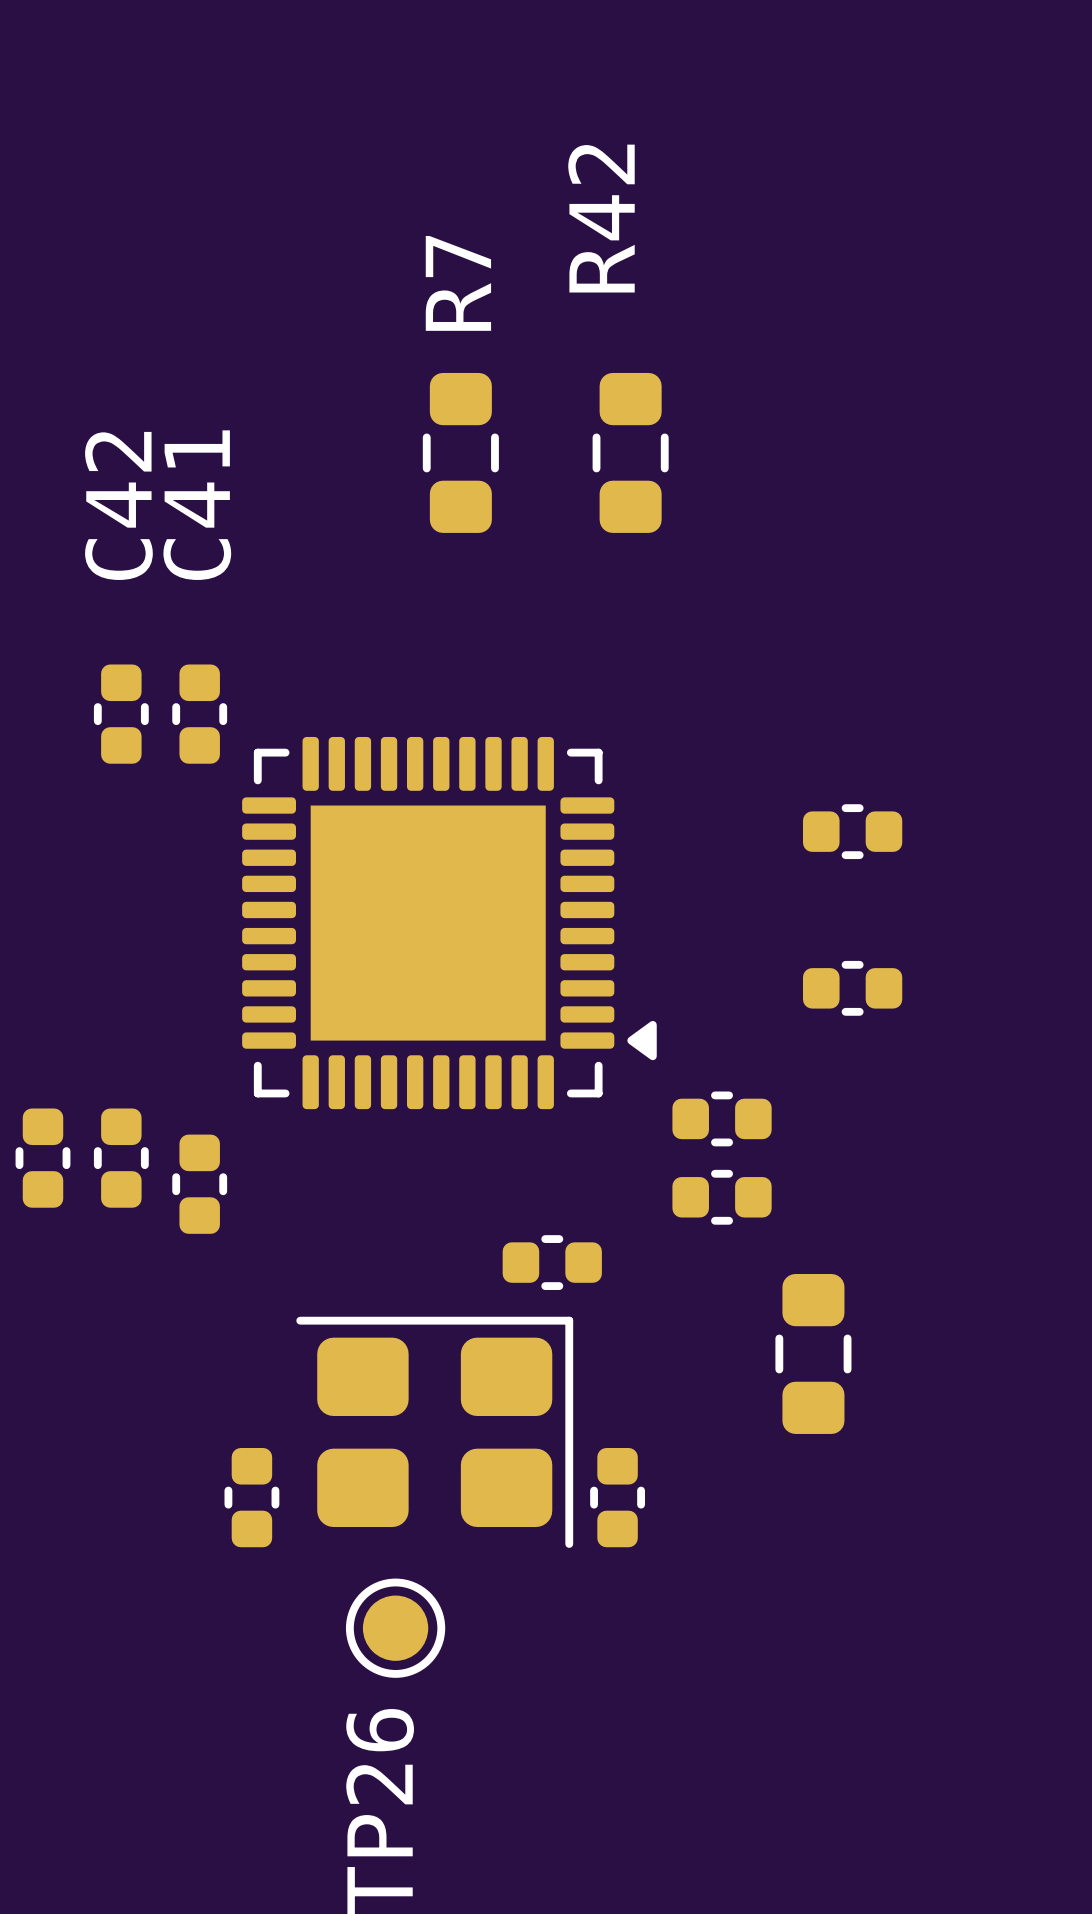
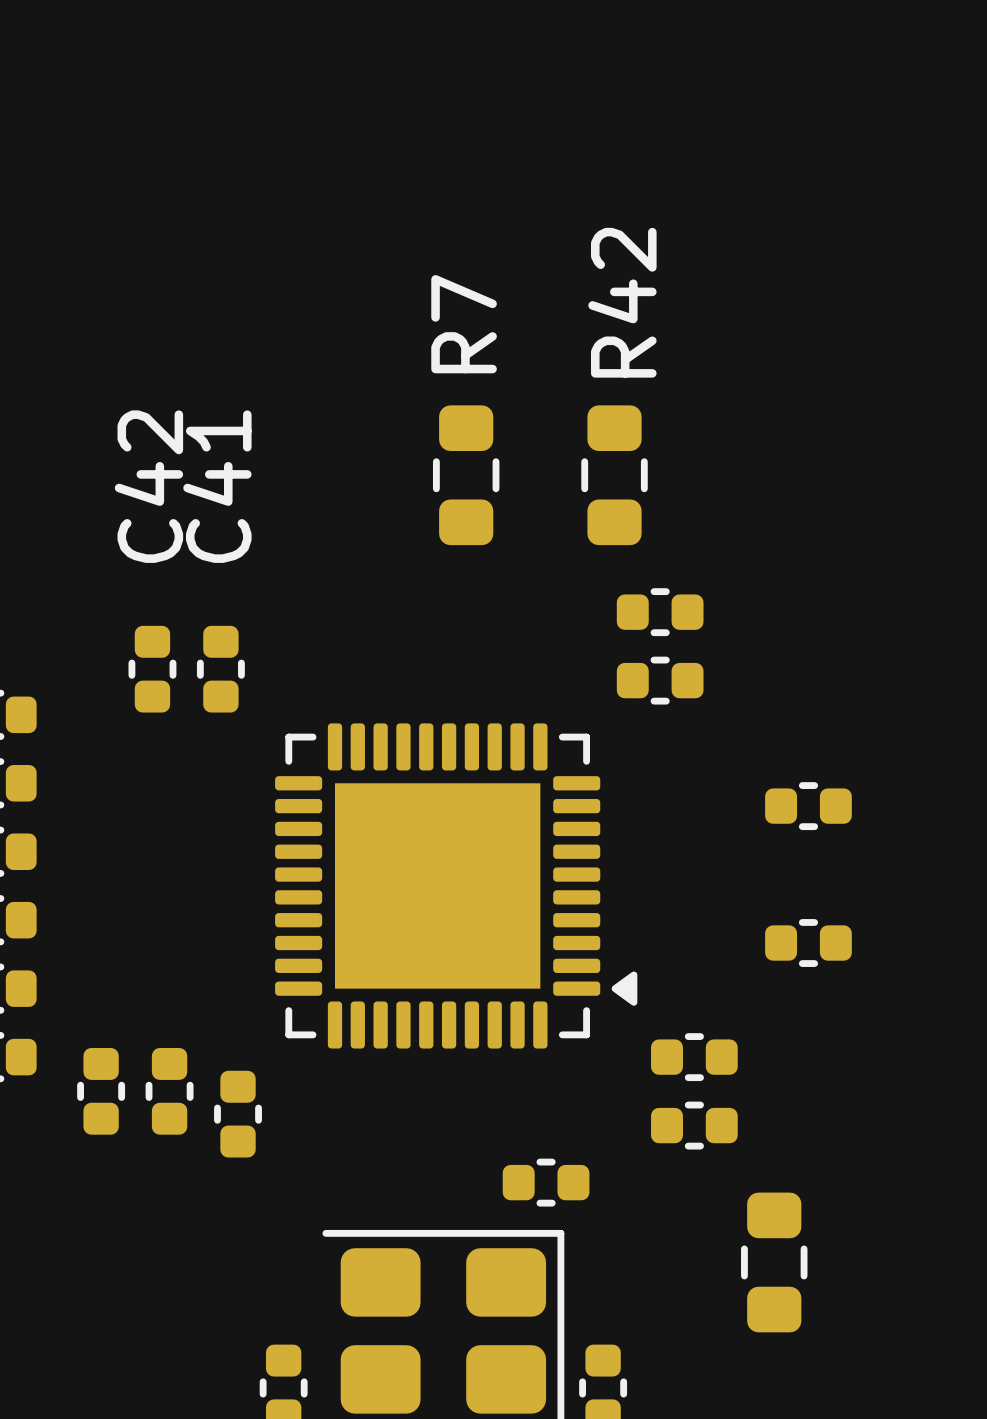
R42 name position: R42 (601, 218) -> R42 (622, 302)
part: none -> (660, 612)
part: none -> (660, 680)
C42 position: (121, 714) -> (152, 669)
C41 position: (199, 714) -> (220, 669)

